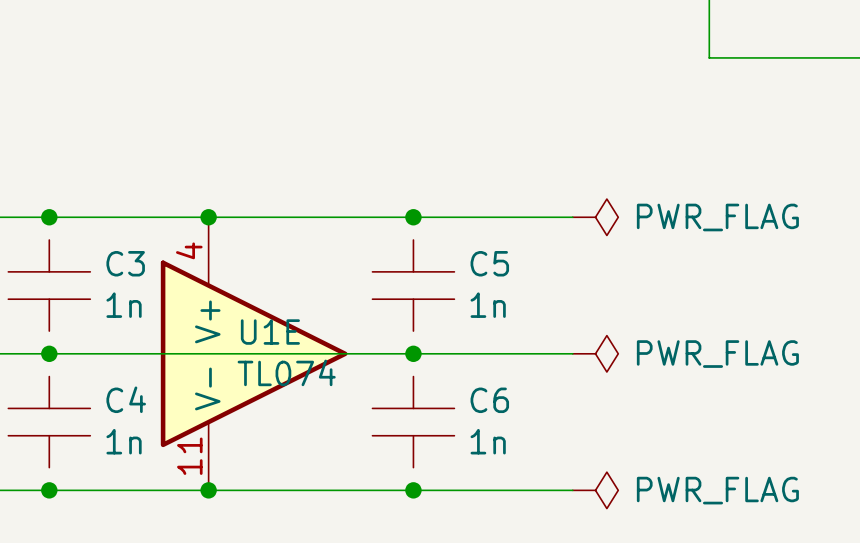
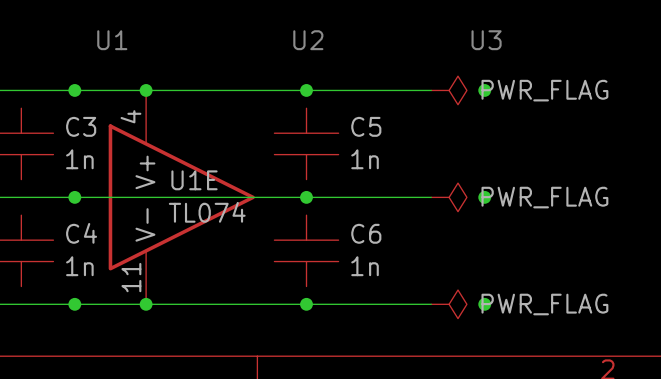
text: none -> U1 (112, 40)
text: none -> U2 (308, 40)
text: none -> U3 (486, 40)
junction position: (49, 217) -> (74, 90)
junction: none -> (484, 90)
junction position: (49, 353) -> (74, 197)
junction: none -> (484, 197)
junction position: (49, 490) -> (74, 304)
junction: none -> (484, 304)

